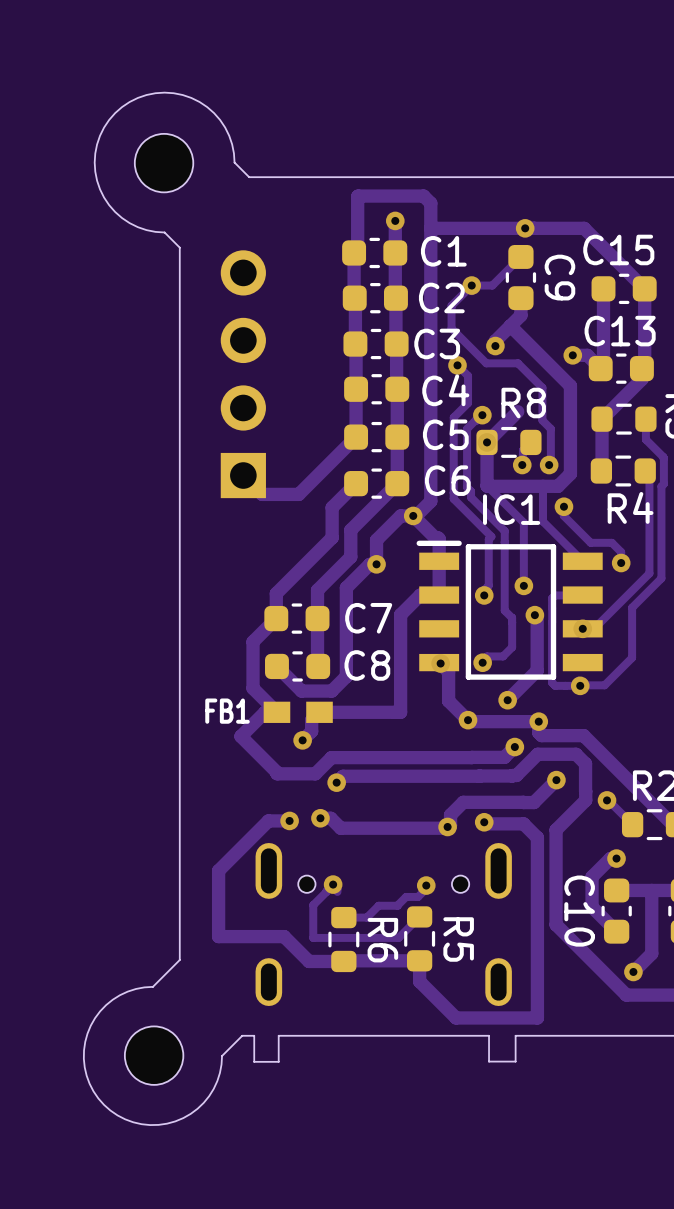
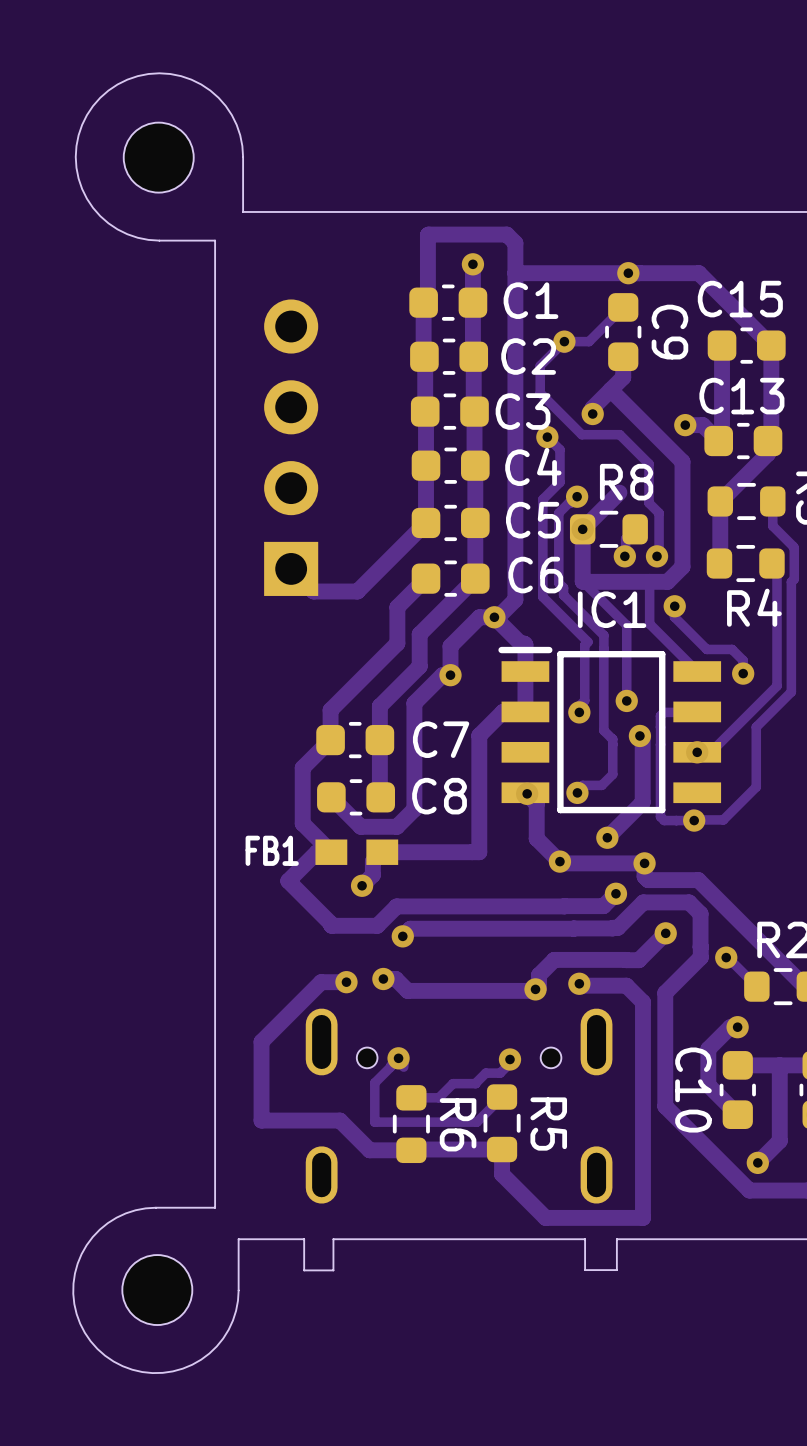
part position: (164, 163) -> (158, 157)
board edge: (249, 177) (234, 162) (232, 144) (220, 119) (207, 107) (191, 97) (173, 93) (155, 93) (129, 101) (115, 113) (104, 127) (95, 153) (95, 171) (100, 189) (109, 205) (122, 218) (146, 230) (164, 232) (179, 247) -> (298, 211) (243, 211) (243, 156) (240, 135) (225, 106) (201, 84) (170, 73) (148, 73) (127, 79) (100, 97) (86, 115) (76, 146) (76, 167) (86, 198) (108, 223) (137, 237) (159, 240) (215, 240) (215, 296)
board edge: (179, 960) (152, 986) (135, 988) (120, 995) (106, 1005) (95, 1018) (87, 1033) (83, 1058) (89, 1083) (98, 1098) (117, 1115) (141, 1124) (158, 1124) (183, 1118) (197, 1108) (209, 1096) (217, 1081) (222, 1056) (242, 1035) -> (215, 1148) (215, 1207) (155, 1207) (135, 1210) (107, 1223) (86, 1245) (74, 1273) (73, 1293) (76, 1314) (90, 1341) (113, 1361) (142, 1372) (162, 1372) (192, 1364) (216, 1346) (232, 1320) (238, 1300) (238, 1239) (289, 1239)
part position: (154, 1055) -> (157, 1290)

